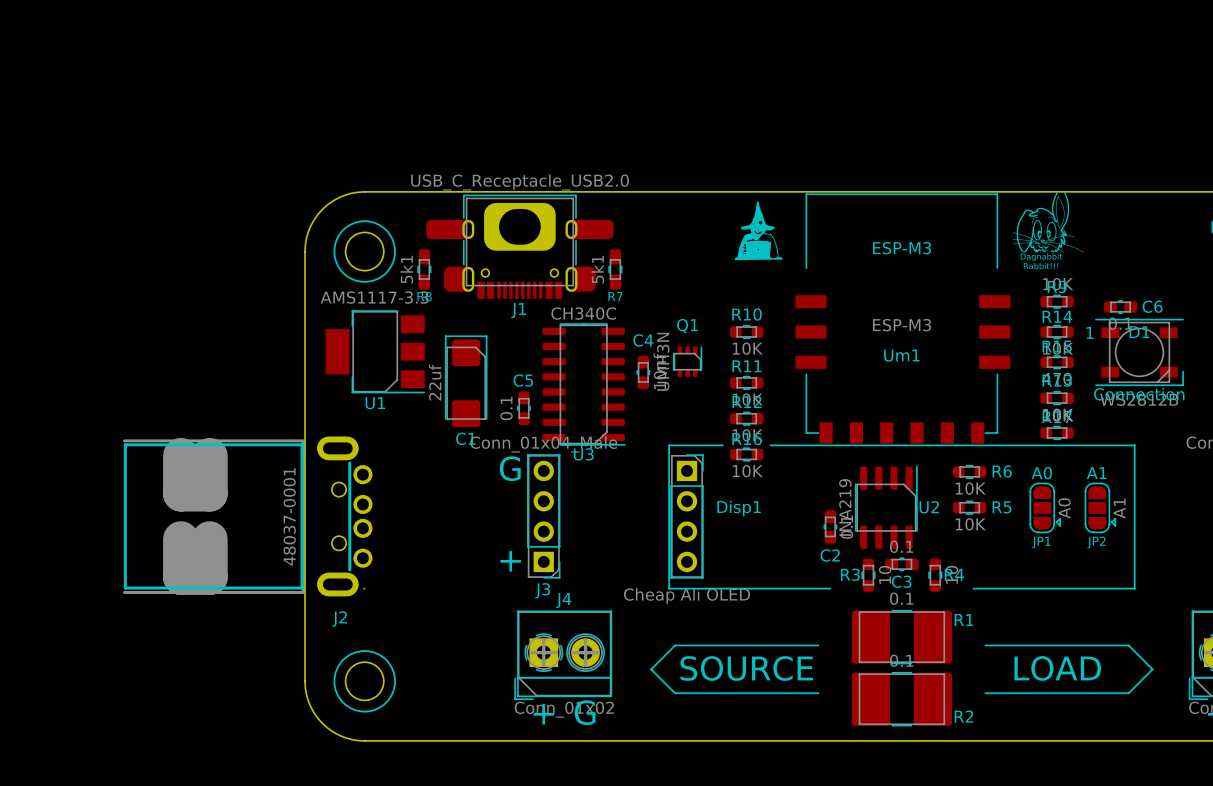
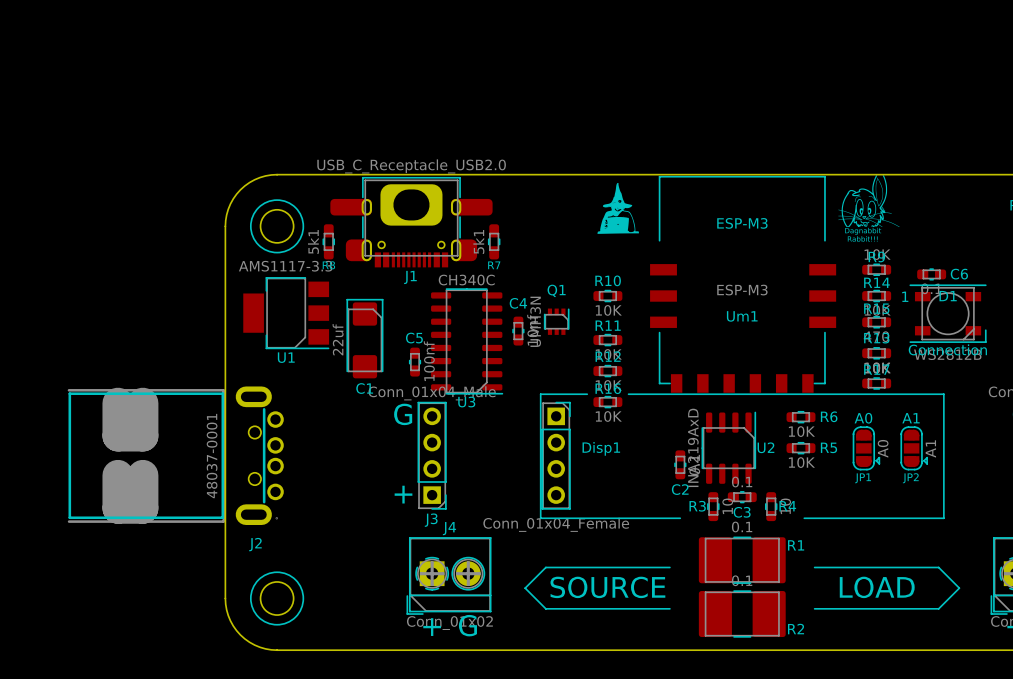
C5 value: 0.1 (506, 408) -> 100nf (429, 361)
U2 value: INA219 (845, 507) -> INA219AxD (693, 447)
Disp1 value: Cheap Ali OLED (687, 595) -> Conn_01x04_Female (556, 524)

